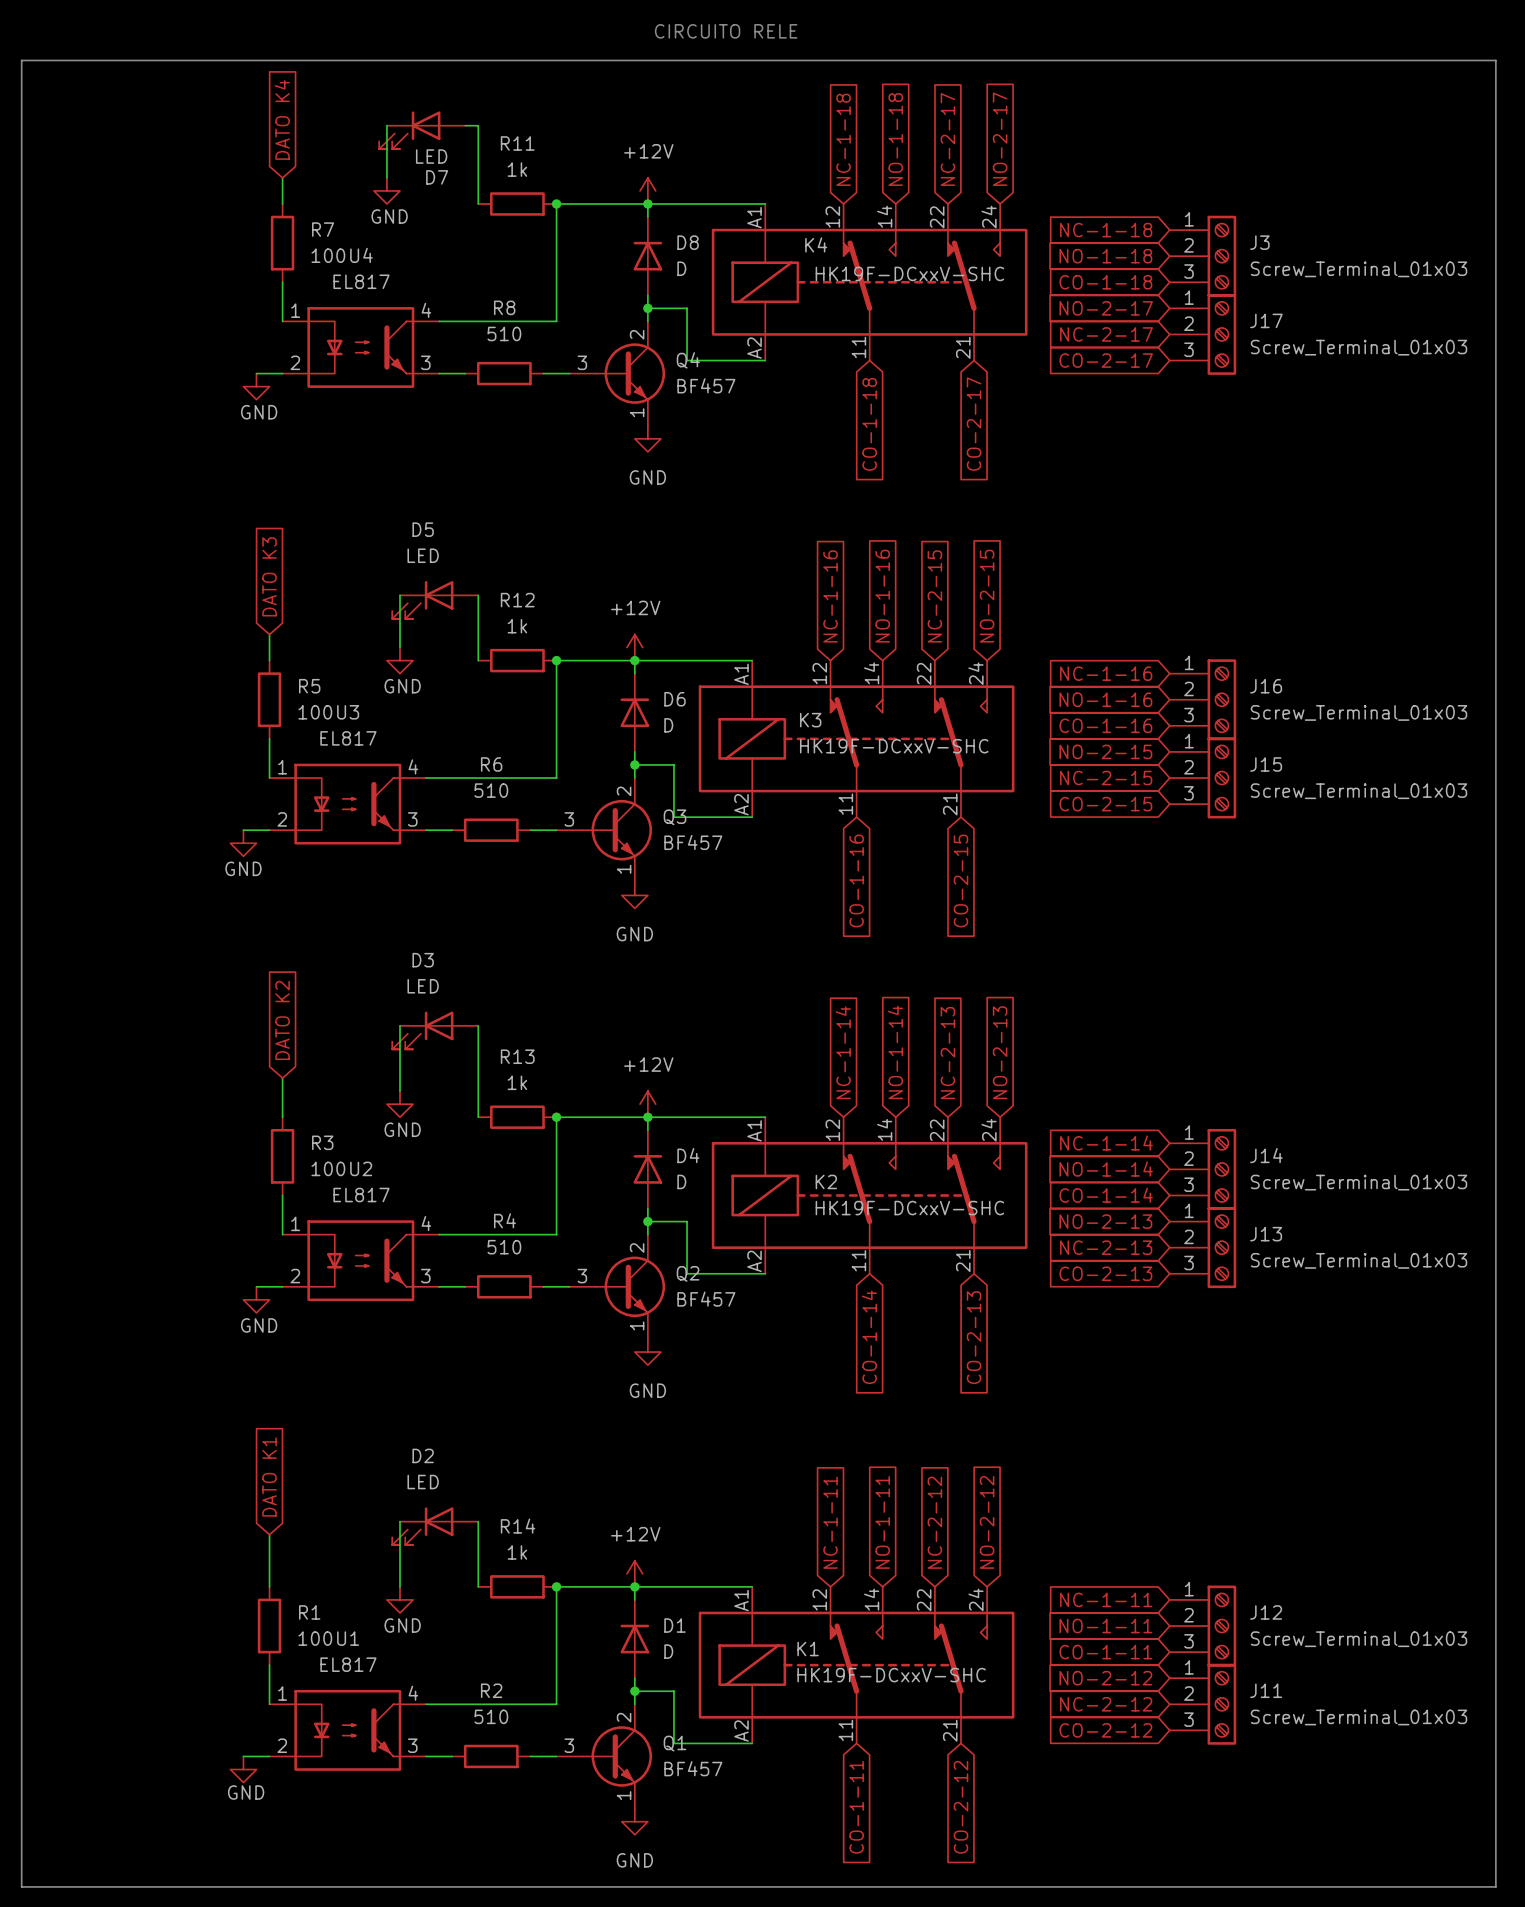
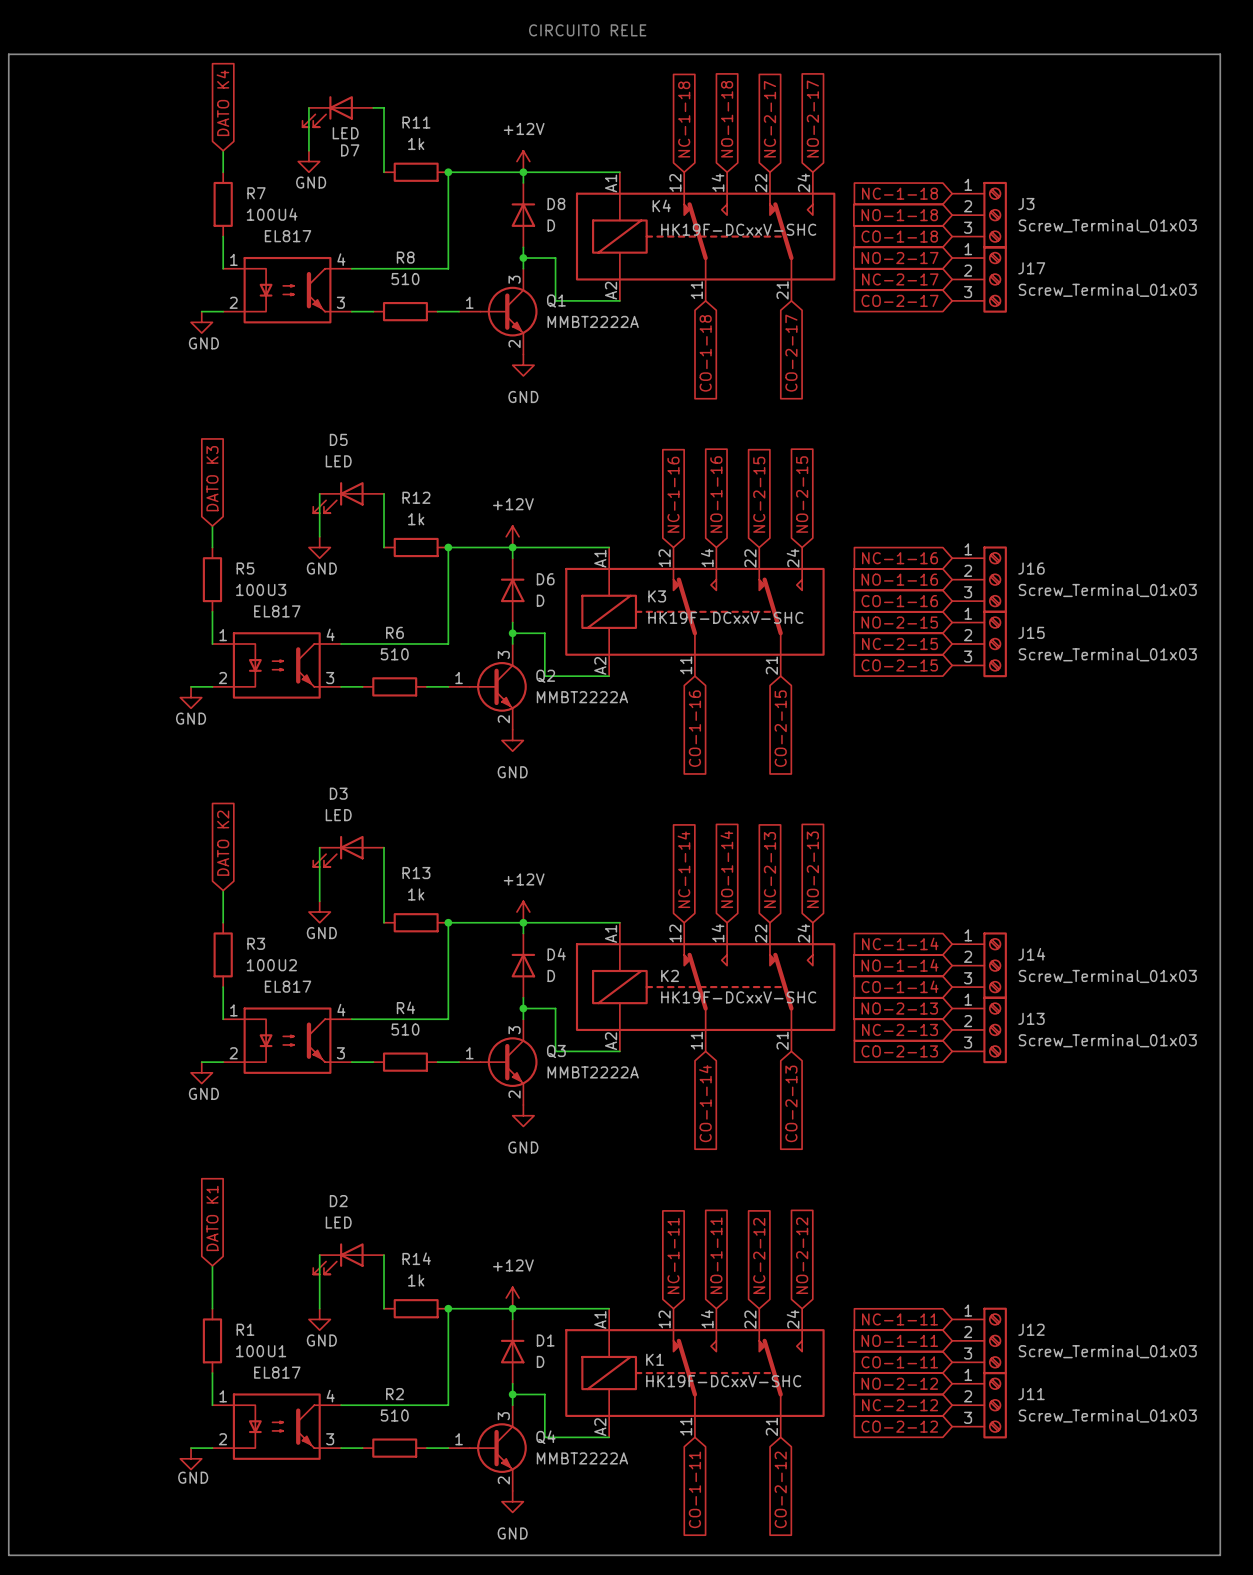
Q4 pin number: 2 (637, 334) -> 3 (503, 1416)
Q4 pin number: 3 (582, 362) -> 1 (459, 1439)
Q4 position: (617, 373) -> (487, 1448)
Q4 value: BF457 (706, 385) -> MMBT2222A (582, 1458)
Q4 pin number: 1 (637, 412) -> 2 (503, 1480)
Q3 pin number: 2 (624, 791) -> 3 (514, 1030)
Q3 pin number: 3 (569, 819) -> 1 (469, 1053)
Q3 position: (604, 830) -> (498, 1062)
Q3 value: BF457 (693, 842) -> MMBT2222A (593, 1072)
Q3 pin number: 1 (624, 869) -> 2 (514, 1094)
Q2 pin number: 2 (637, 1247) -> 3 (503, 654)
Q2 pin number: 3 (582, 1276) -> 1 (459, 678)
Q2 position: (617, 1286) -> (487, 686)
Q2 value: BF457 (706, 1299) -> MMBT2222A (582, 697)
Q2 pin number: 1 (637, 1325) -> 2 (503, 719)
Q1 pin number: 2 (624, 1717) -> 3 (514, 279)
Q1 pin number: 3 (569, 1745) -> 1 (469, 302)
Q1 position: (604, 1756) -> (498, 311)
Q1 value: BF457 (693, 1768) -> MMBT2222A (593, 321)
Q1 pin number: 1 (624, 1795) -> 2 (514, 344)

